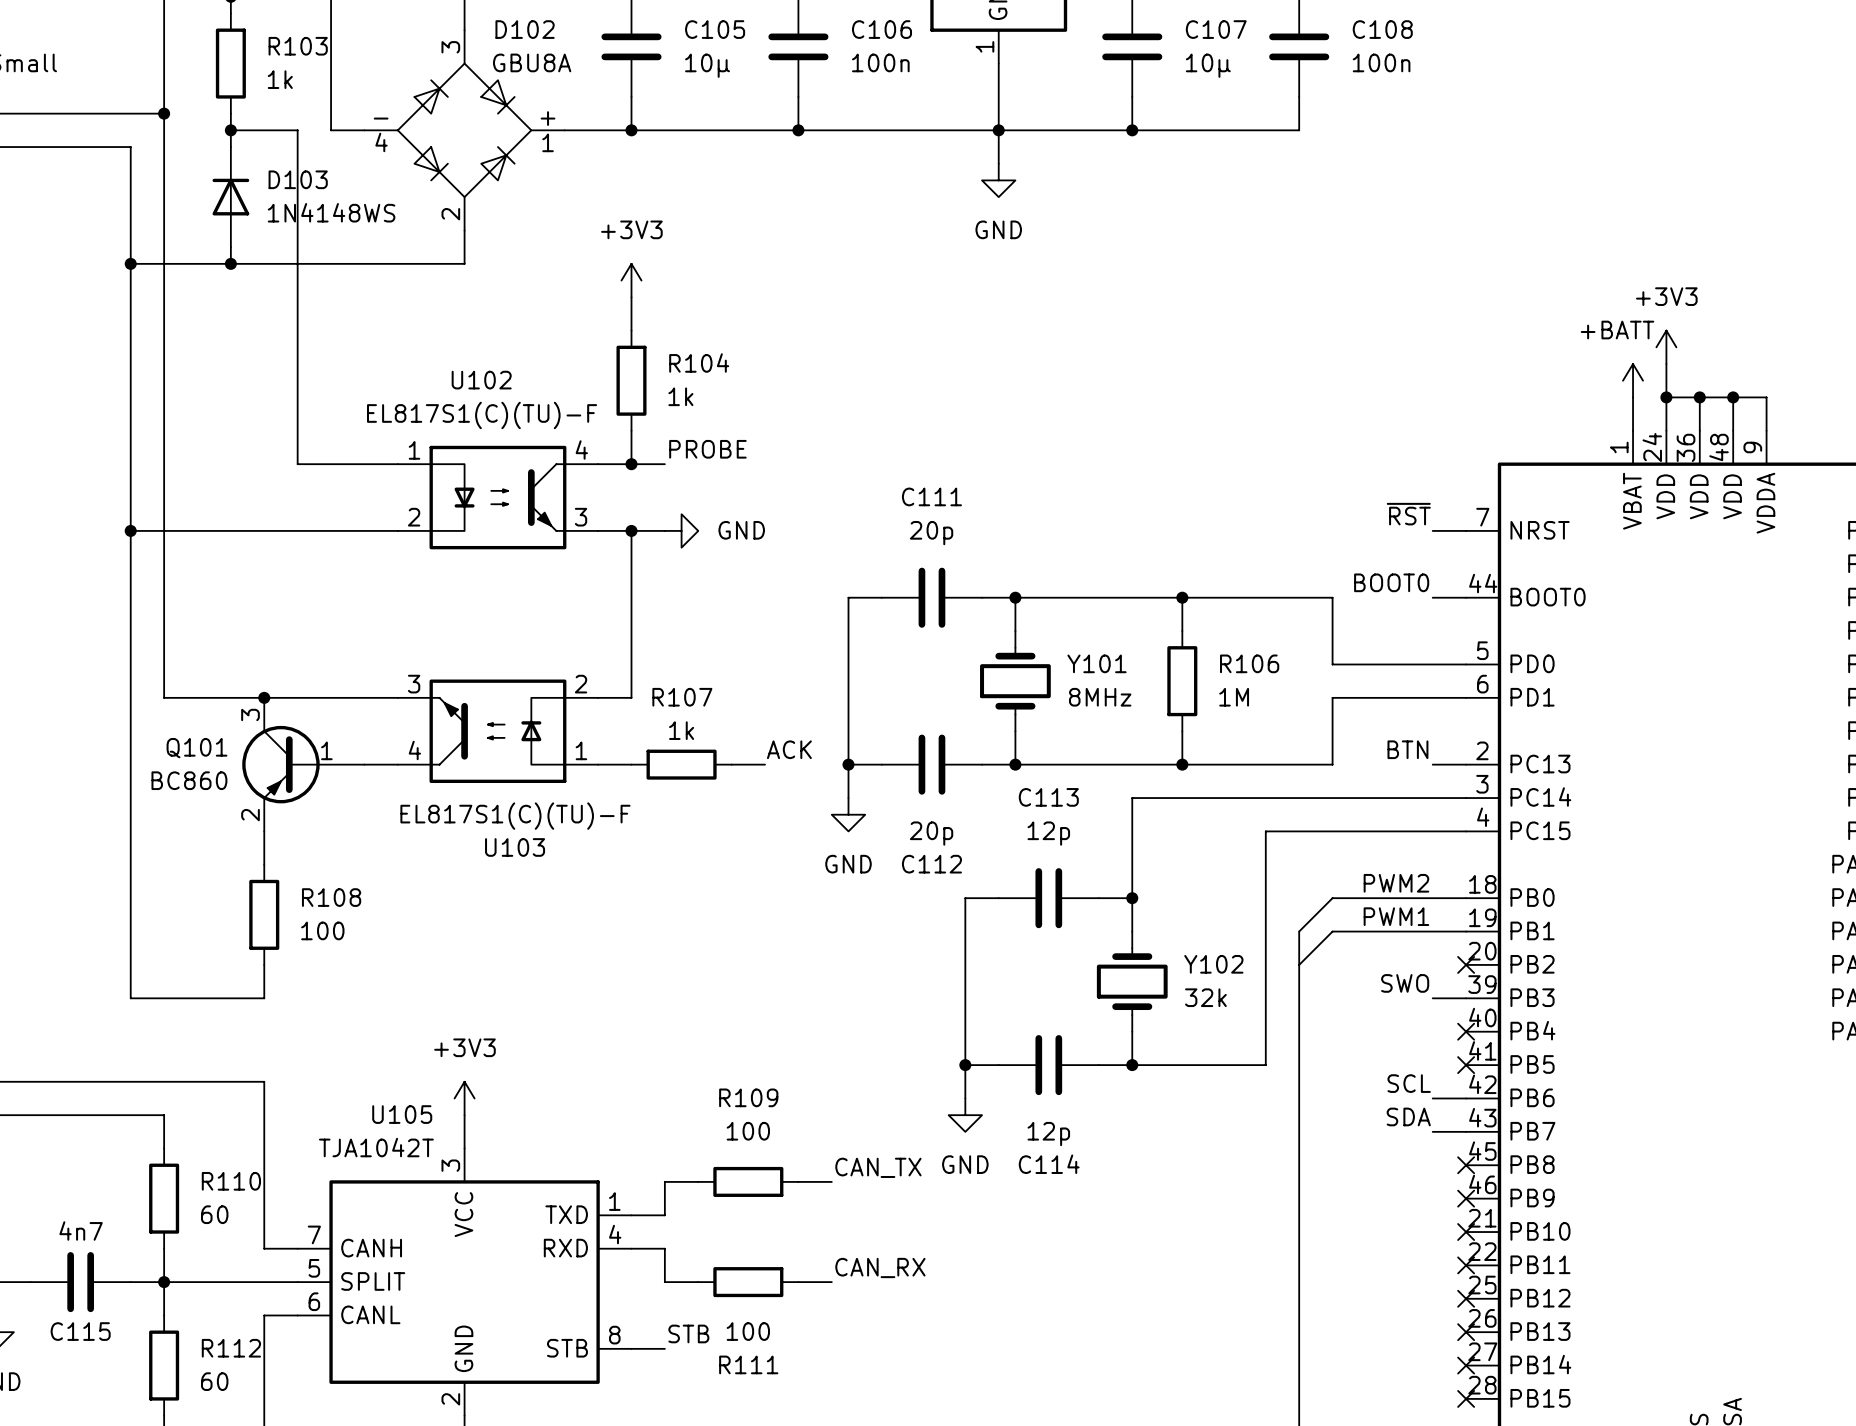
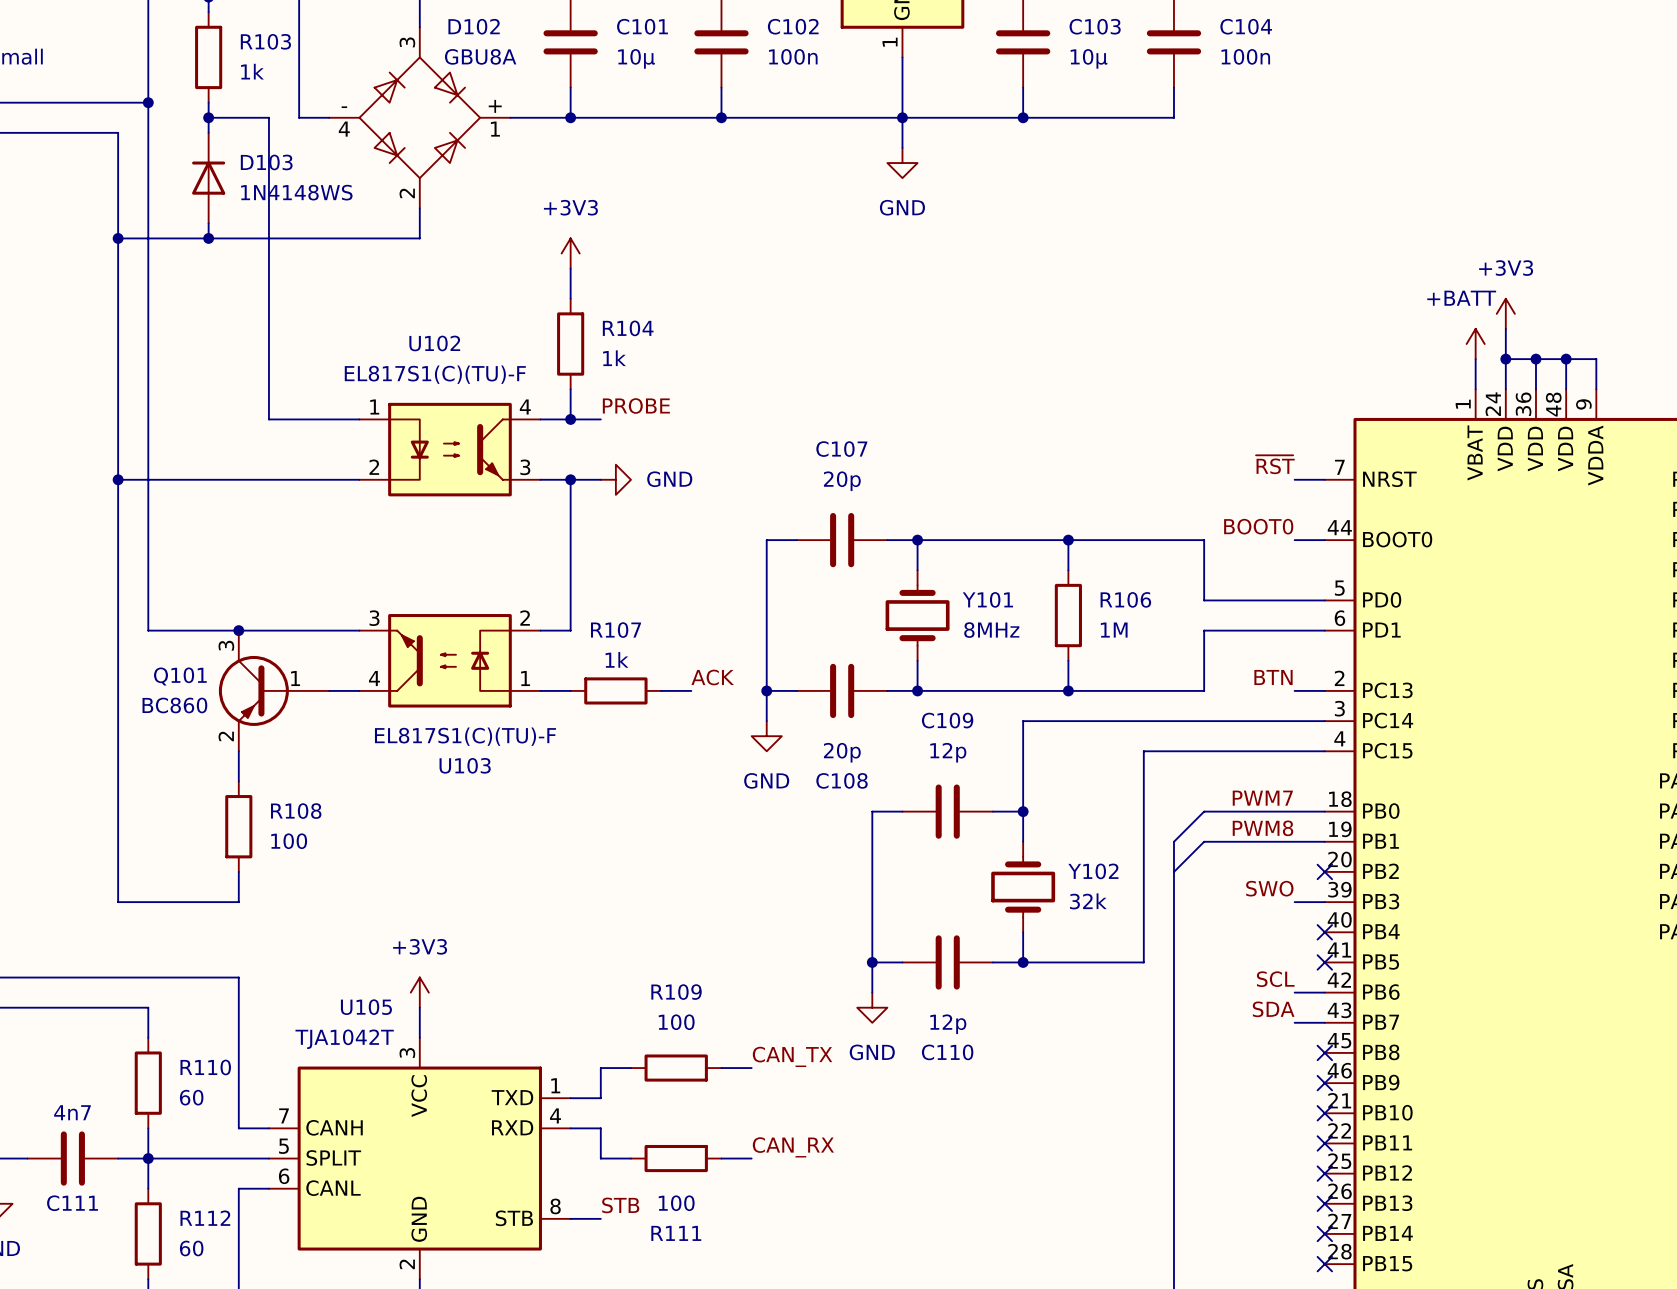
C105 name: C105 (715, 29) -> C101 (642, 26)
C106 name: C106 (882, 29) -> C102 (793, 26)
C107 name: C107 (1216, 29) -> C103 (1095, 26)
C108 name: C108 (1382, 29) -> C104 (1246, 26)
C111 name: C111 (931, 496) -> C107 (841, 449)
C113 name: C113 (1048, 797) -> C109 (947, 720)
C112 name: C112 (931, 864) -> C108 (842, 780)
label: PWM2 (1396, 883) -> PWM7 (1262, 798)
label: PWM1 (1396, 916) -> PWM8 (1262, 828)
C114 name: C114 (1049, 1164) -> C110 (947, 1052)
C115 name: C115 (80, 1331) -> C111 (72, 1203)

